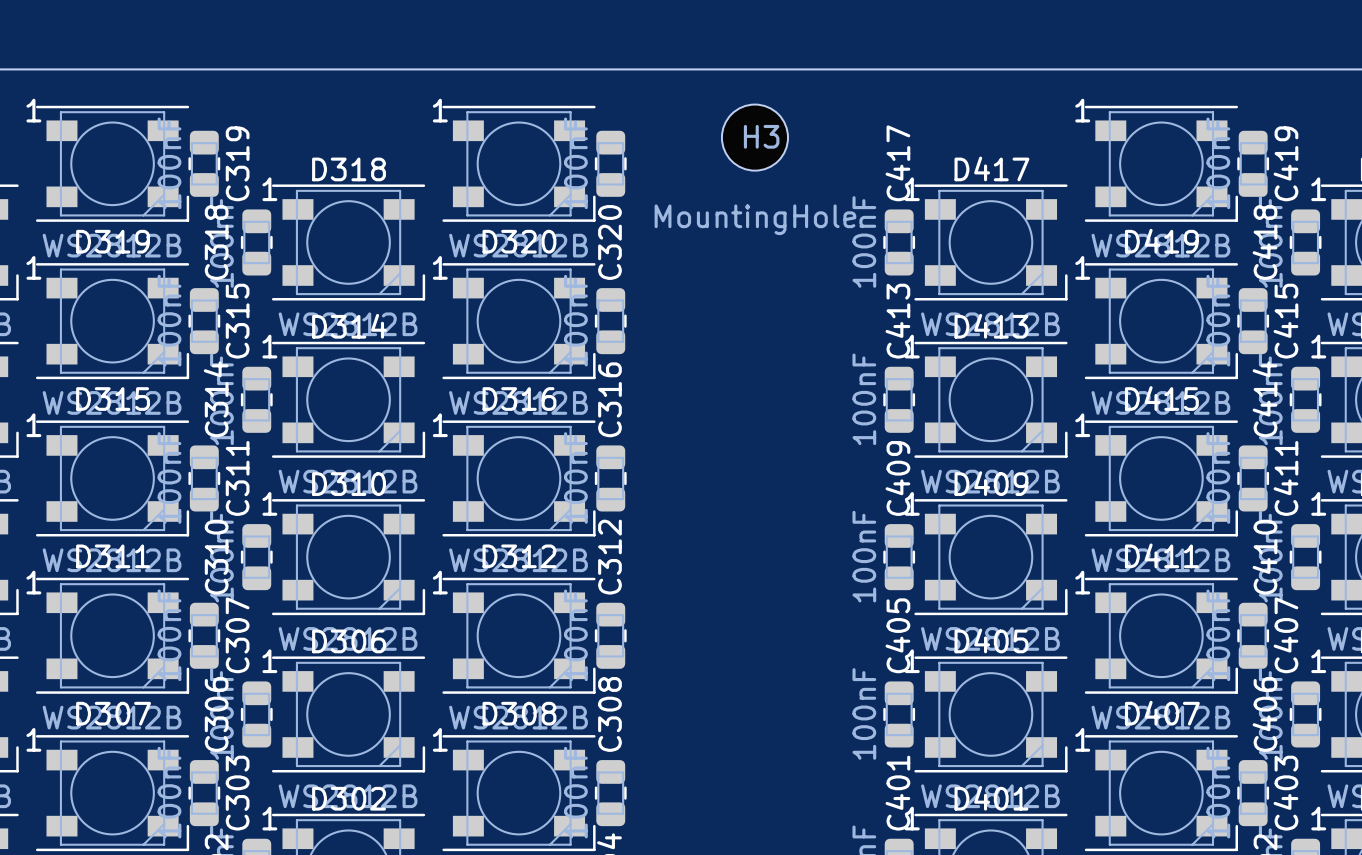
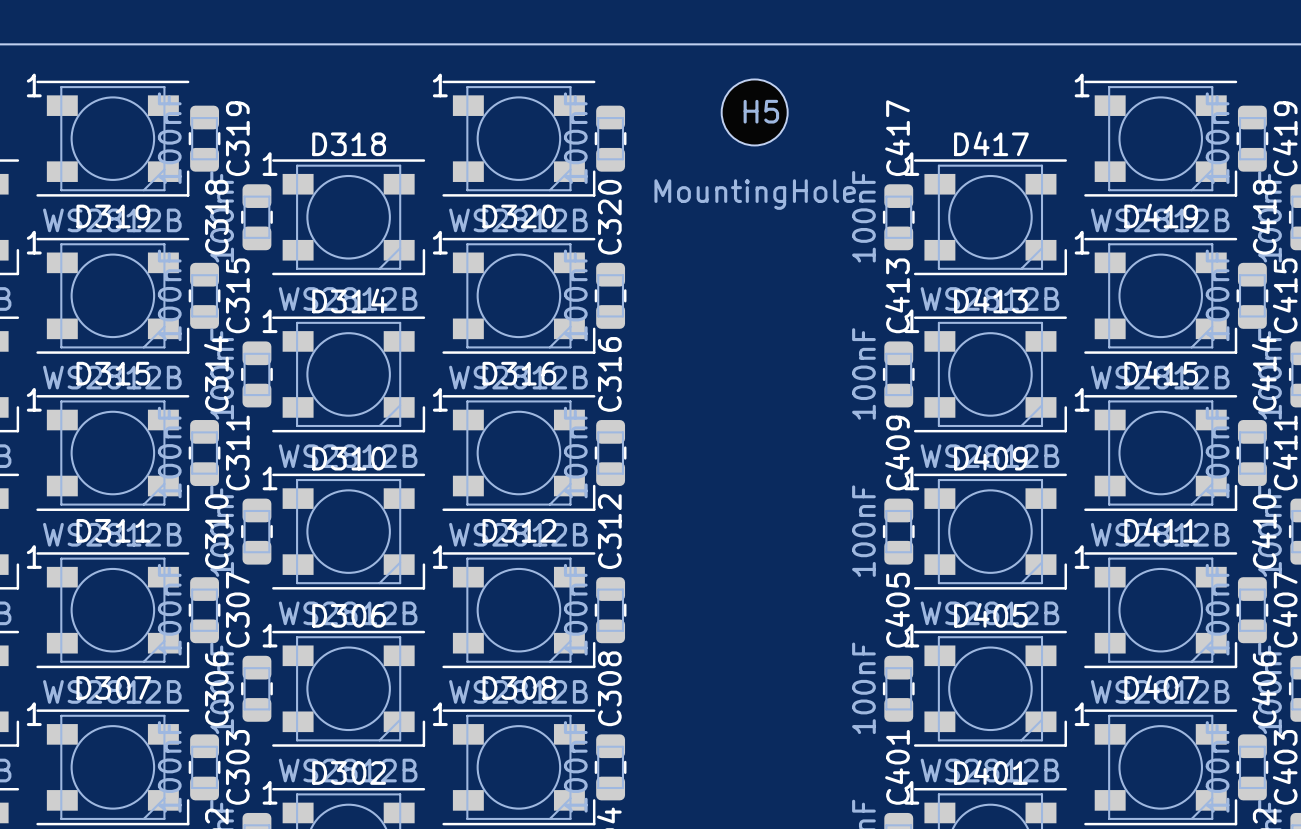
H3 name: H3 (761, 136) -> H5 (761, 111)

